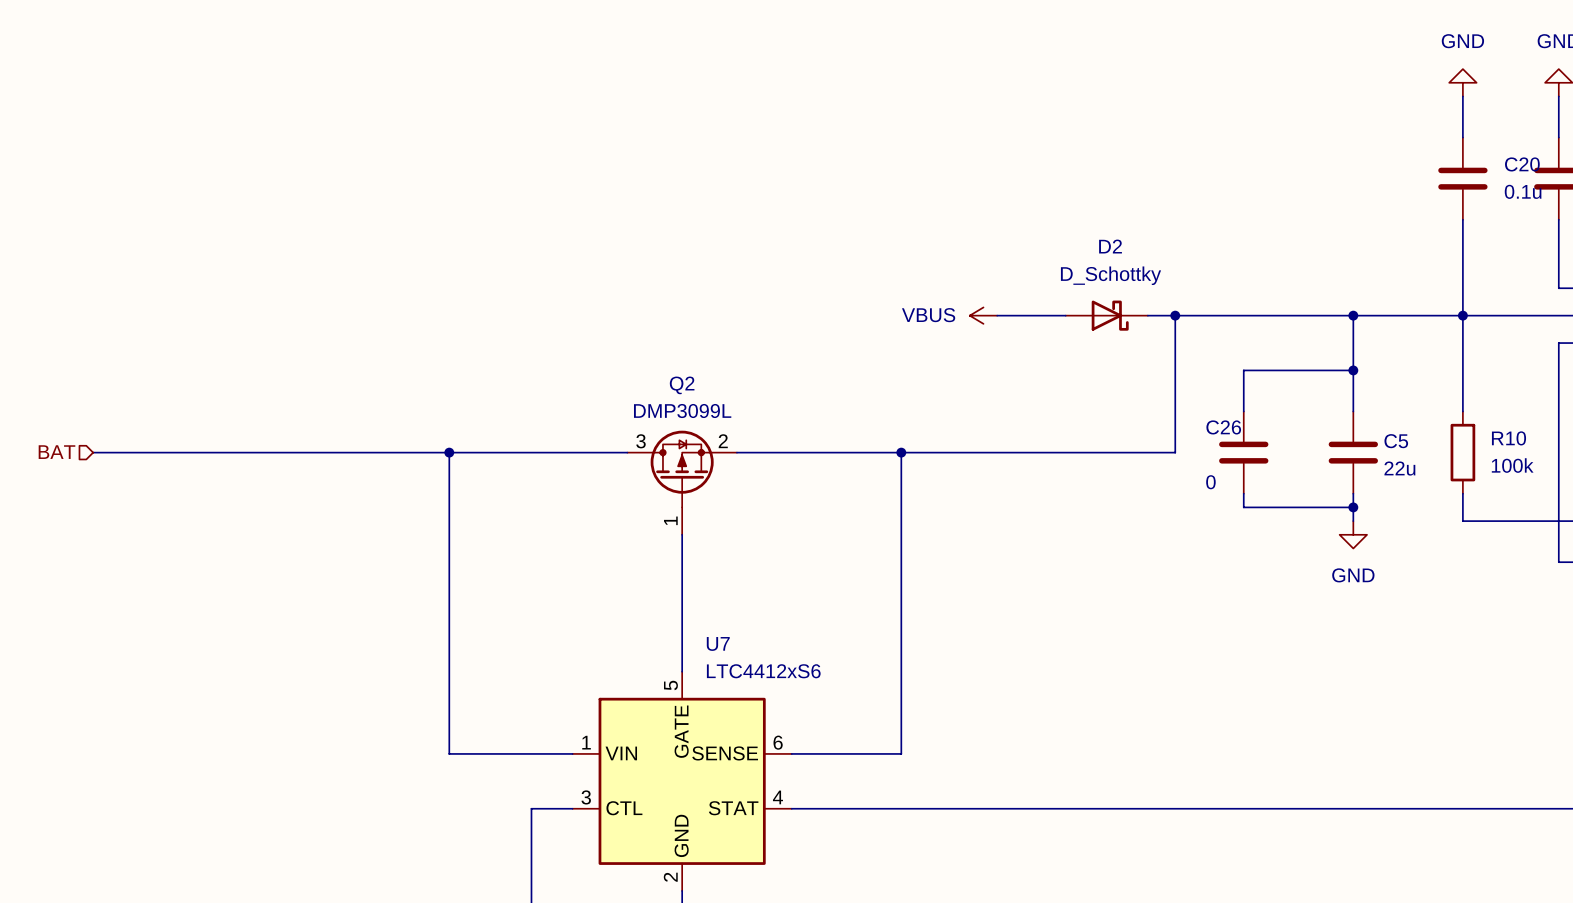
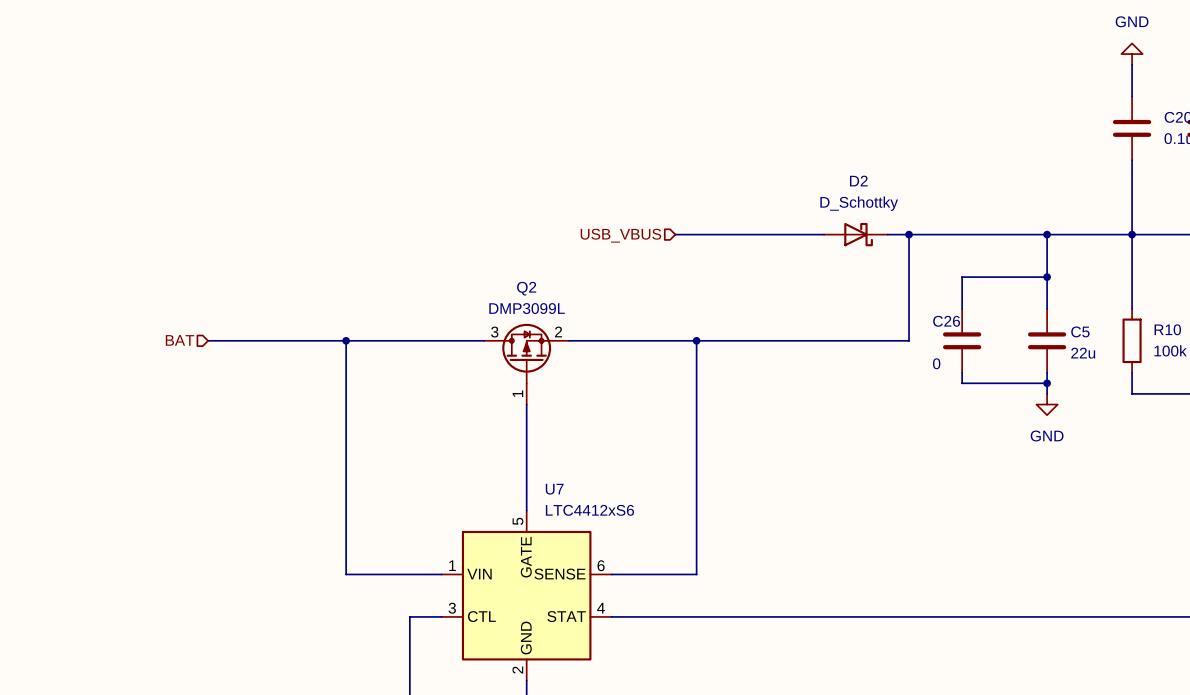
wire: none -> (675, 234) (770, 234)
power symbol: VBUS (983, 315) -> none
hierarchical label: none -> USB_VBUS (620, 235)
hierarchical label position: BAT (57, 452) -> BAT (180, 340)
wire: (93, 452) (271, 452) -> none

